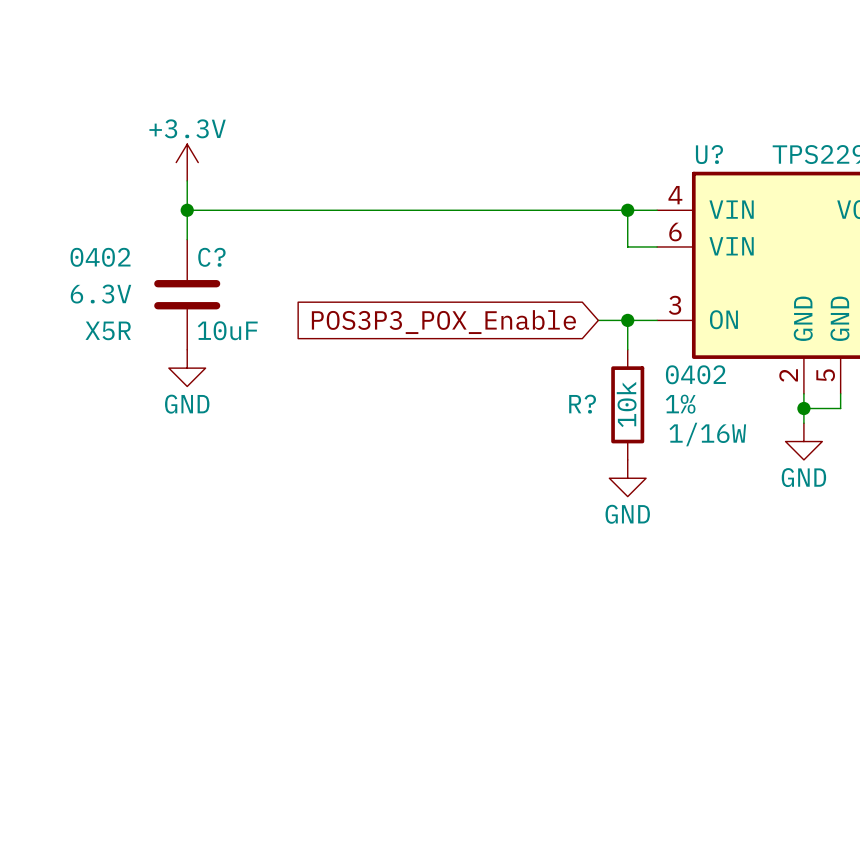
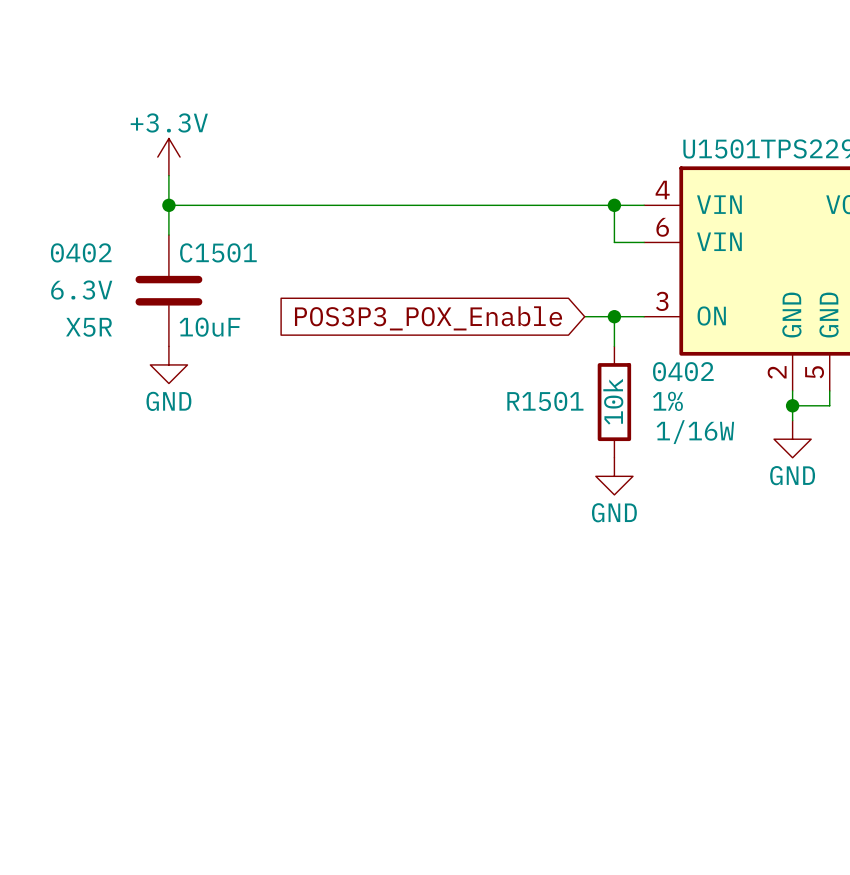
U? name: U? (709, 154) -> U1501 (721, 148)
C? name: C? (211, 257) -> C1501 (218, 252)
R? name: R? (582, 404) -> R1501 (545, 401)

